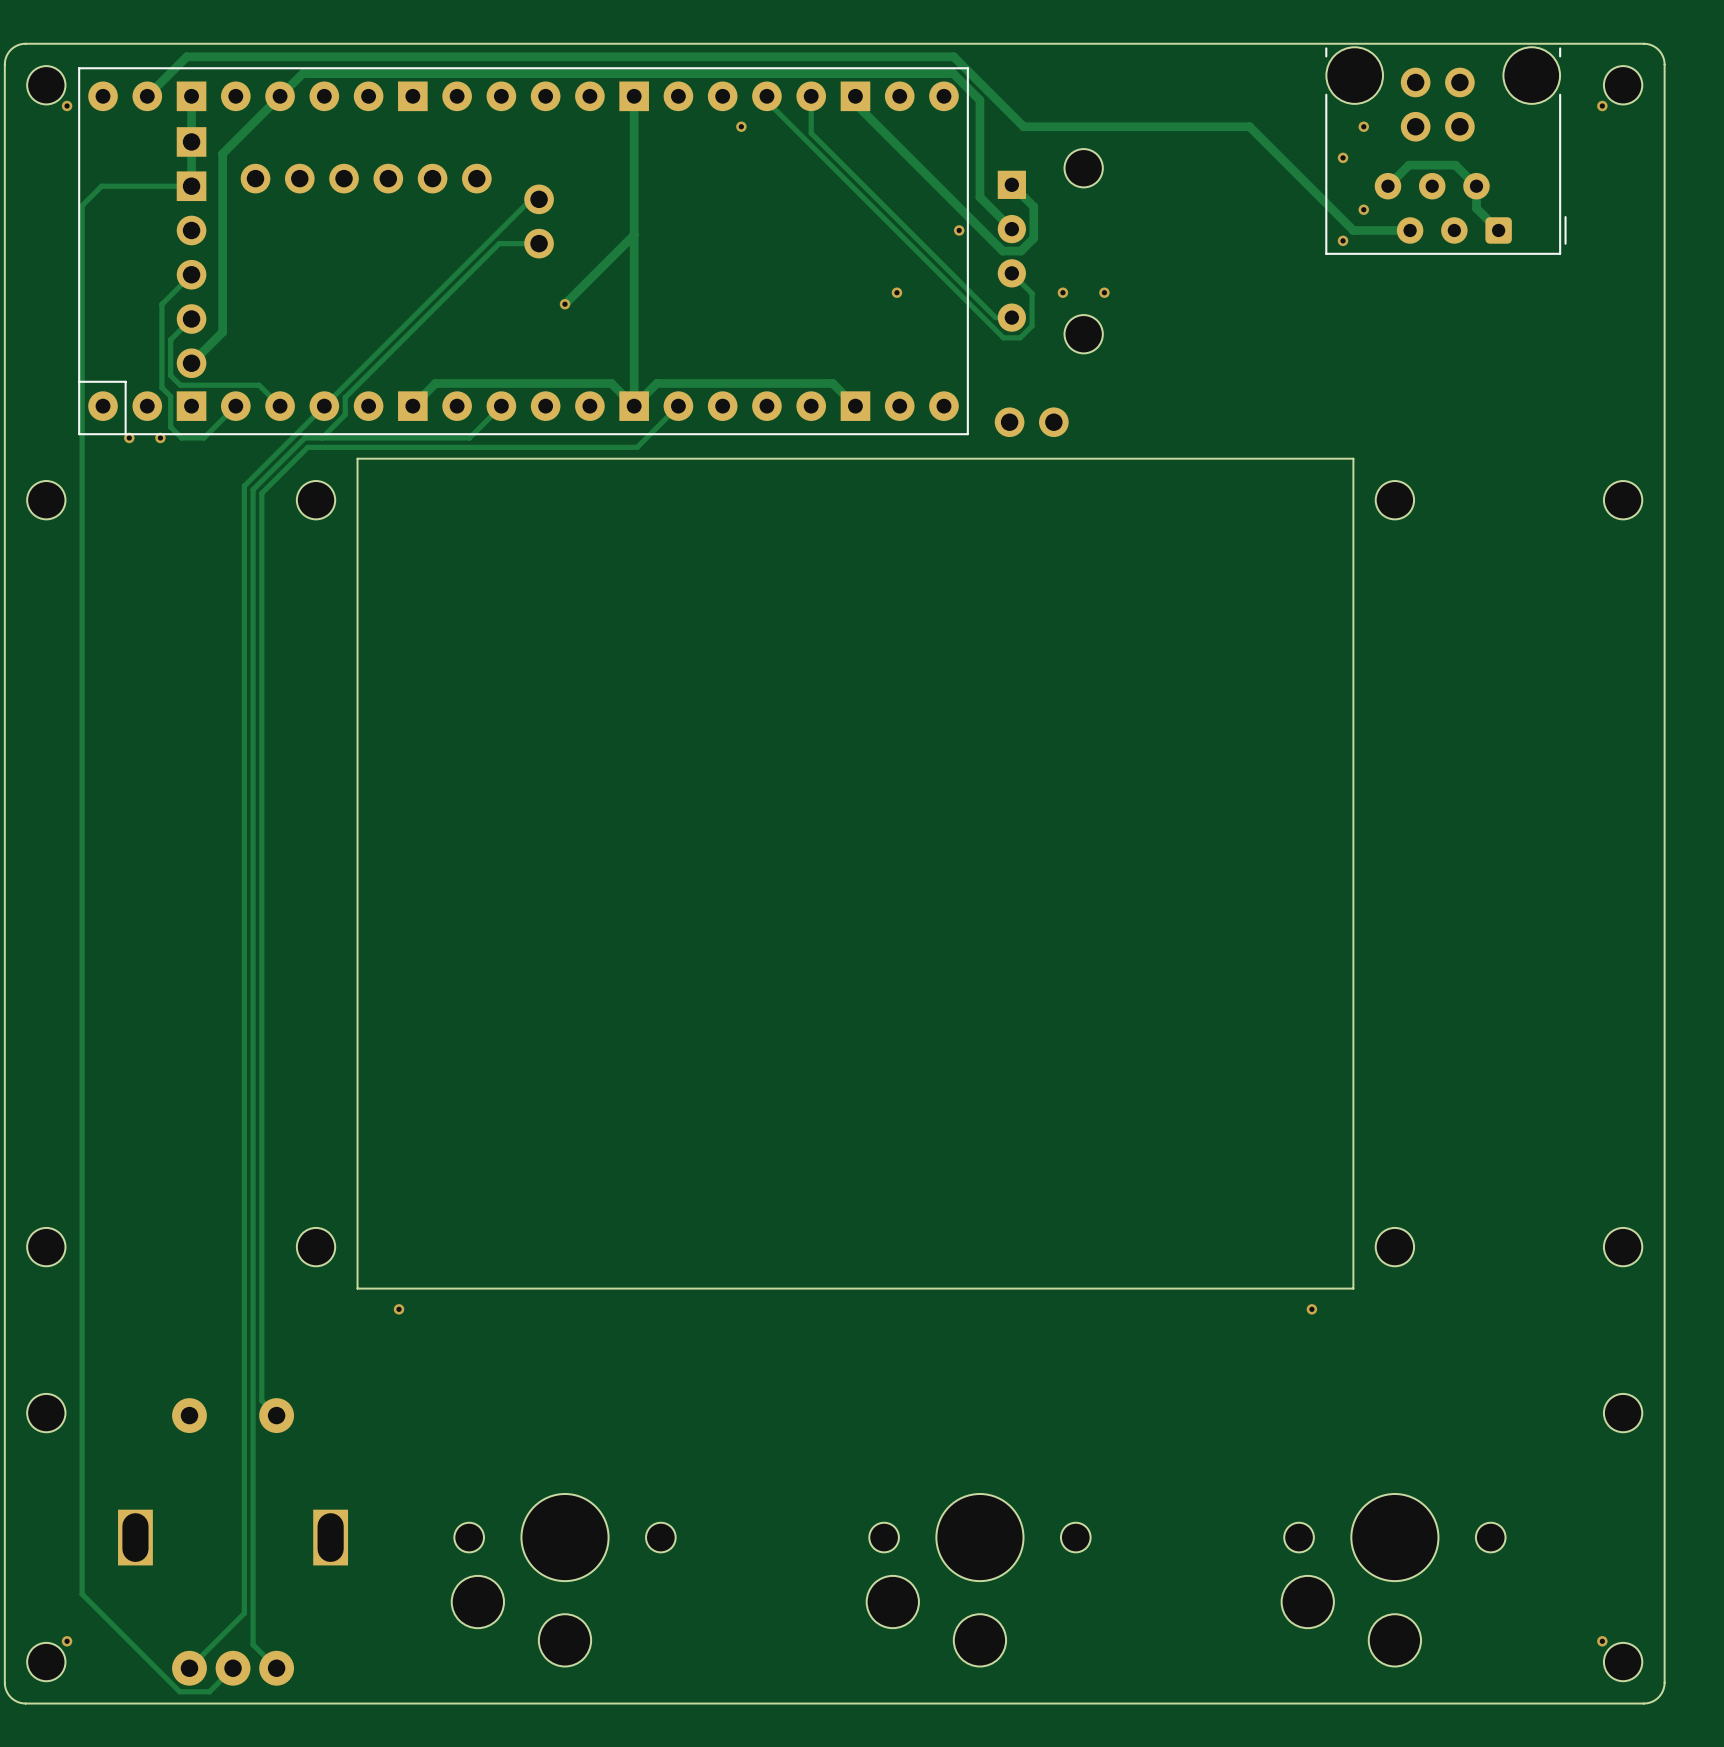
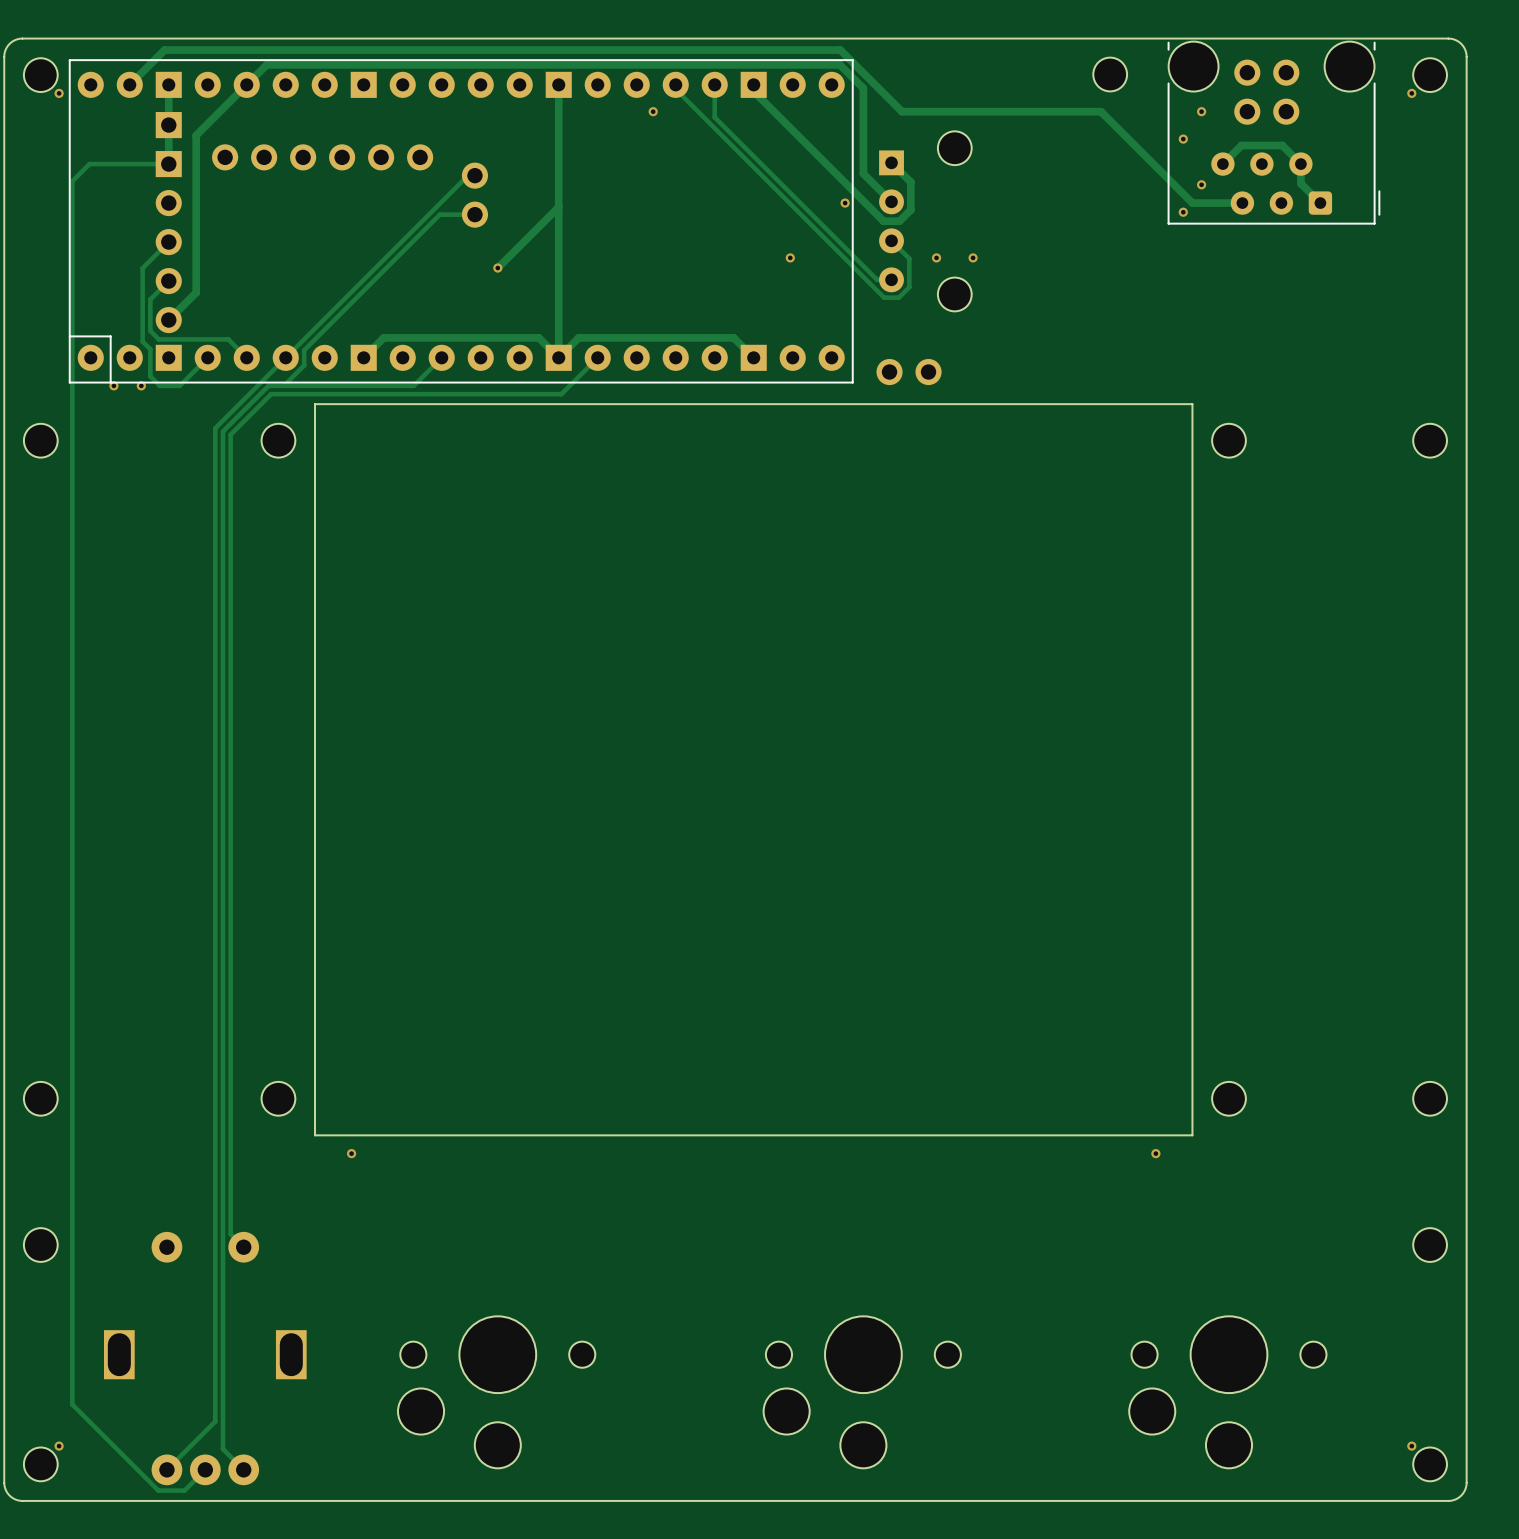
part: none -> (1110, 74)

